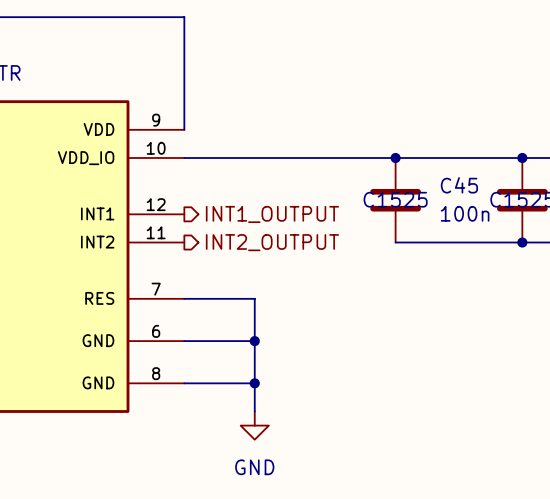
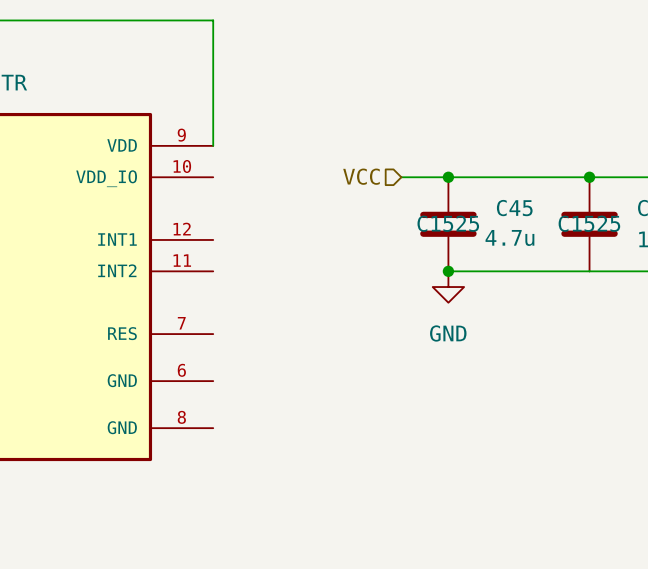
hierarchical label: none -> VCC (361, 176)
wire: (184, 158) (353, 158) -> none
C45 value: 100n (465, 213) -> 4.7u (509, 237)
hierarchical label: INT1_OUTPUT (272, 214) -> none
hierarchical label: INT2_OUTPUT (272, 242) -> none
junction: none -> (448, 271)
junction: (522, 242) -> none
wire: (184, 298) (254, 298) (254, 411) -> none
wire: (184, 341) (254, 341) -> none
junction: (254, 341) -> none
wire: (184, 383) (254, 383) -> none
junction: (254, 383) -> none
power symbol position: GND (254, 425) -> GND (448, 287)

